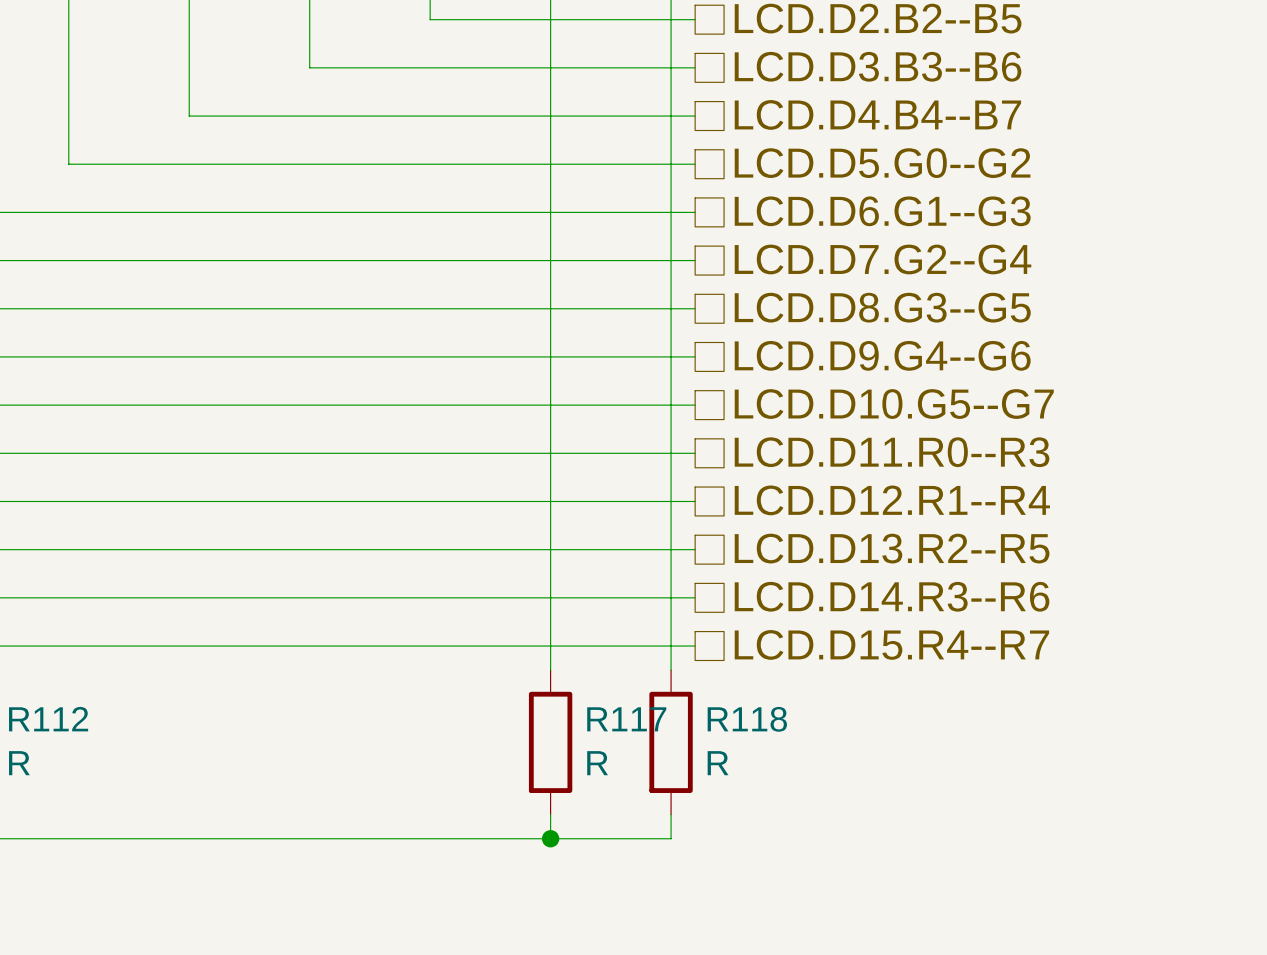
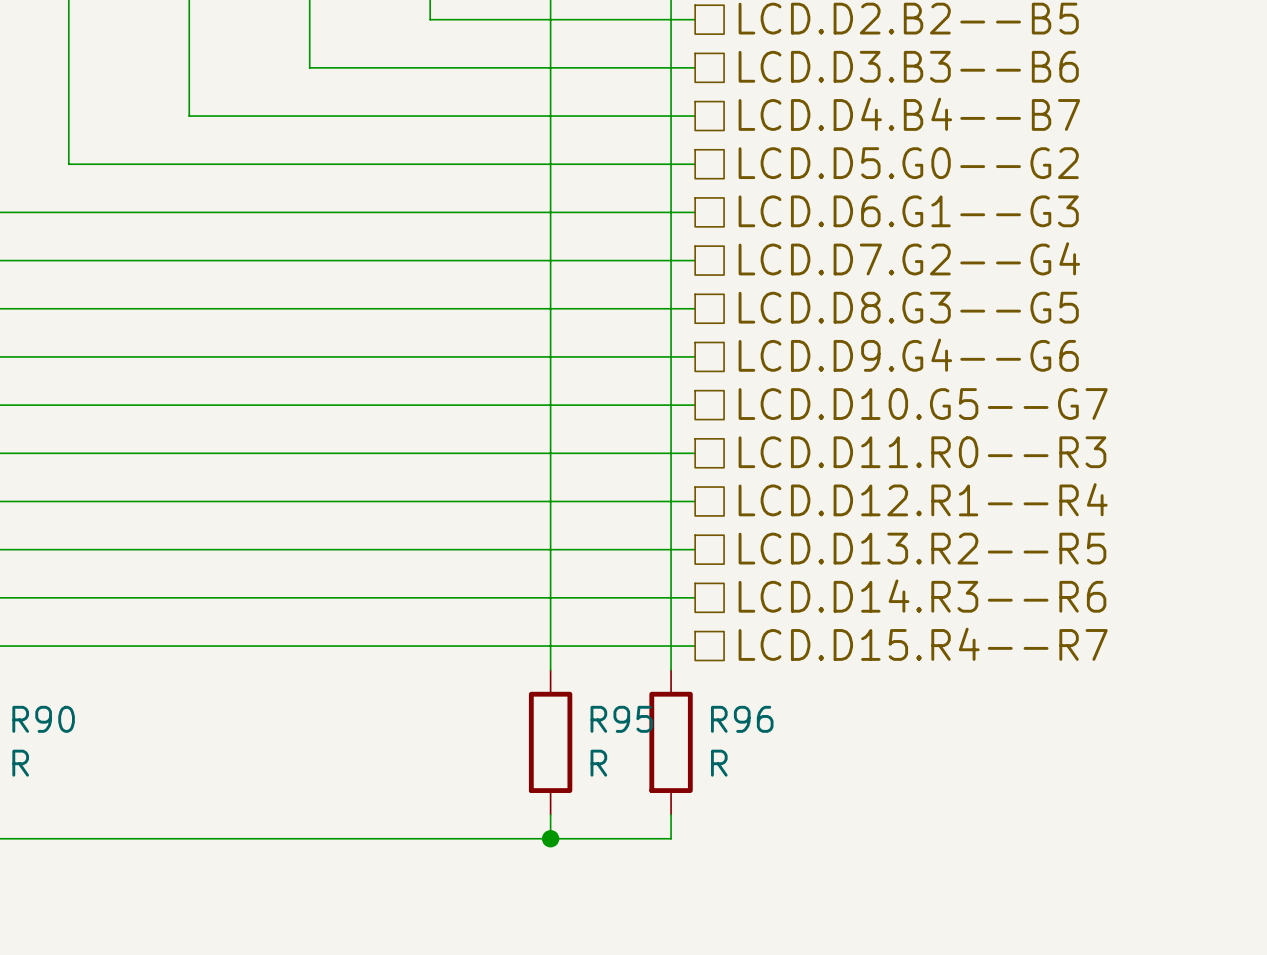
R112 name: R112 (48, 719) -> R90 (43, 719)
R117 name: R117 (626, 719) -> R95 (621, 719)
R118 name: R118 (747, 719) -> R96 (742, 719)

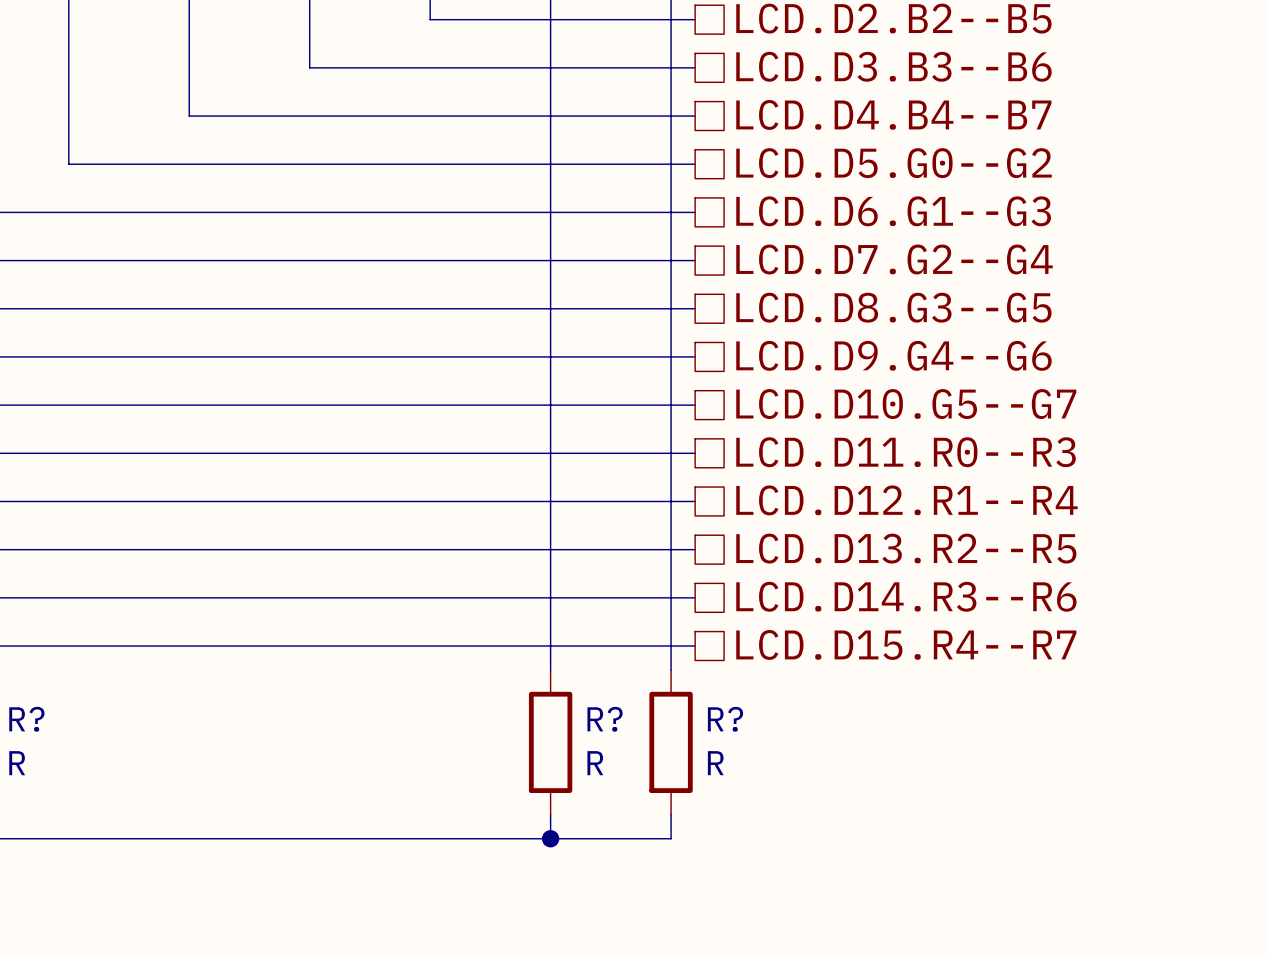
R90 name: R90 (43, 719) -> R? (26, 719)
R95 name: R95 (621, 719) -> R? (605, 719)
R96 name: R96 (742, 719) -> R? (725, 719)

